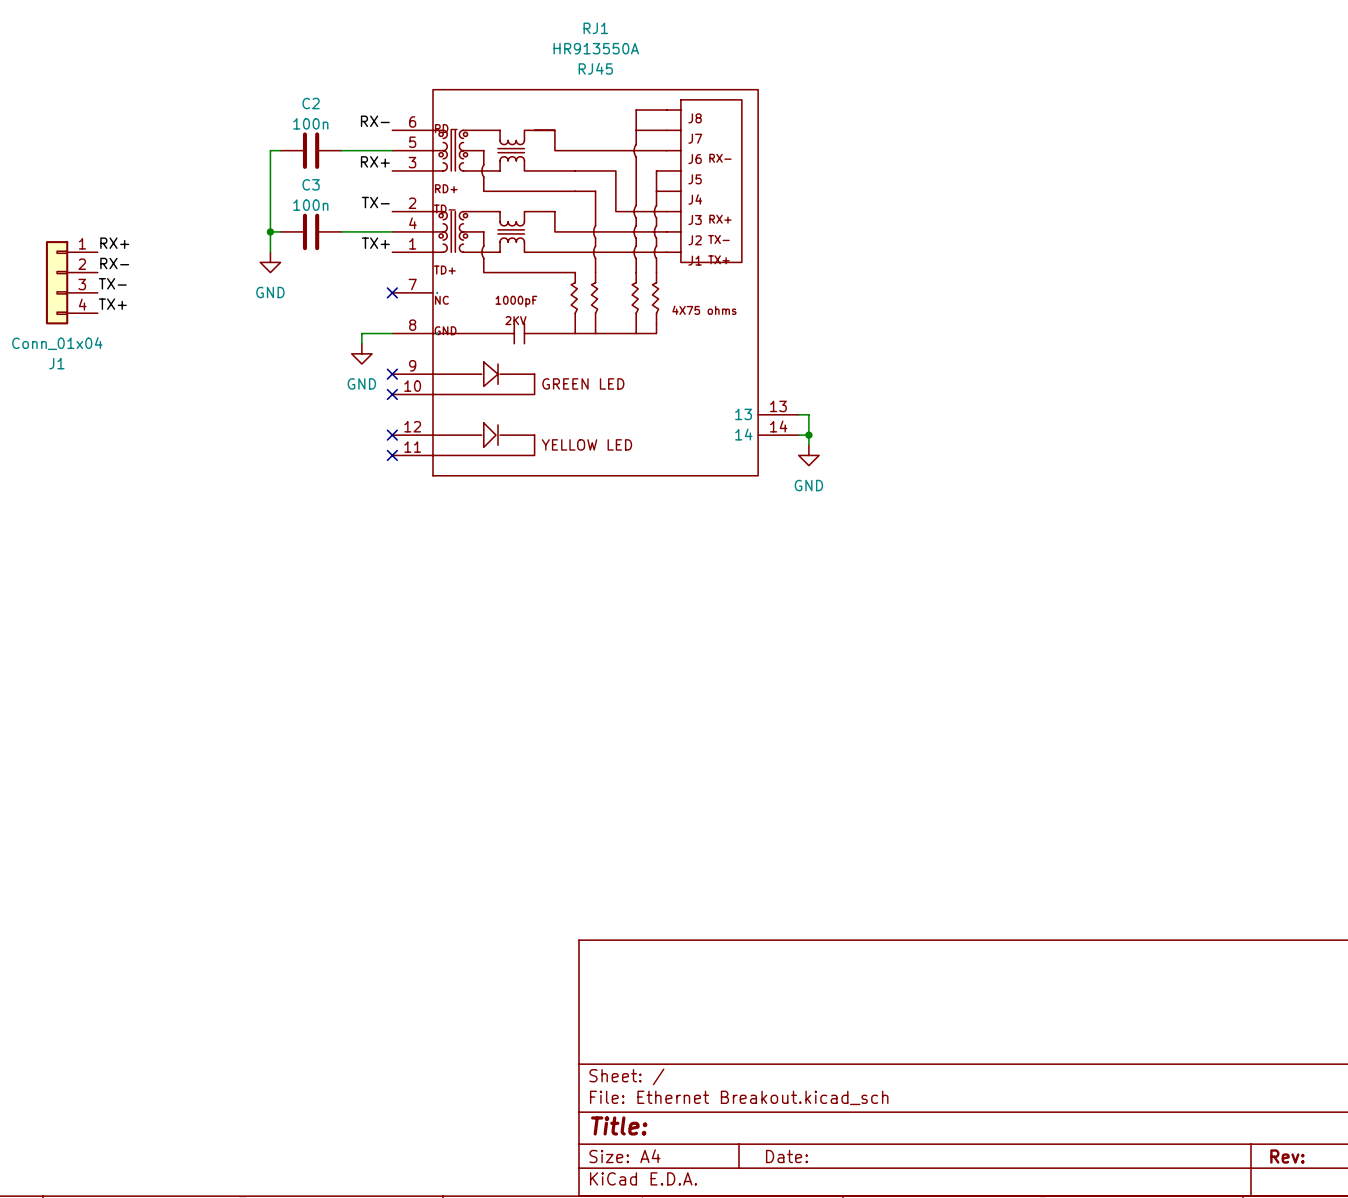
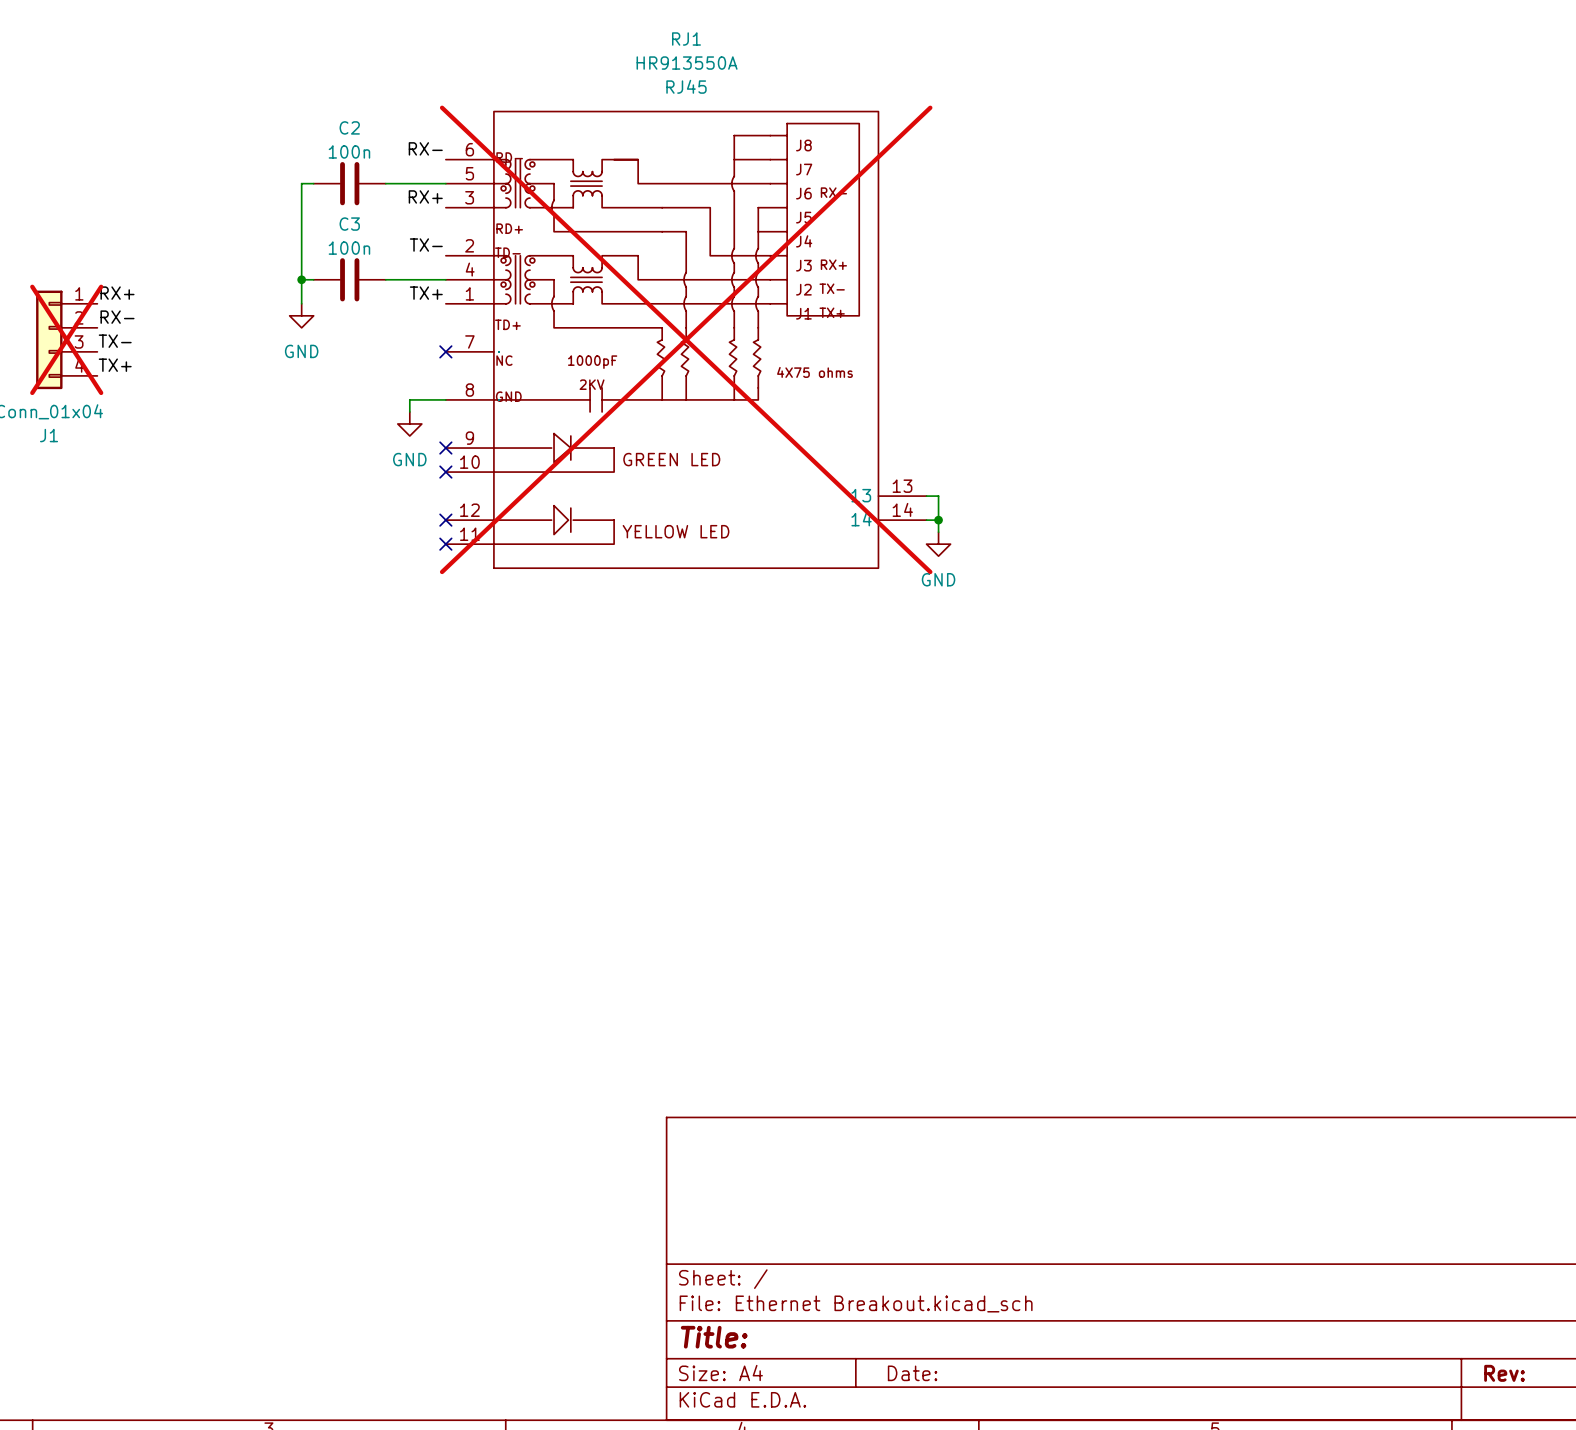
J1 do-not-place cross: none -> (66, 339)
RJ1 do-not-place cross: none -> (686, 339)

